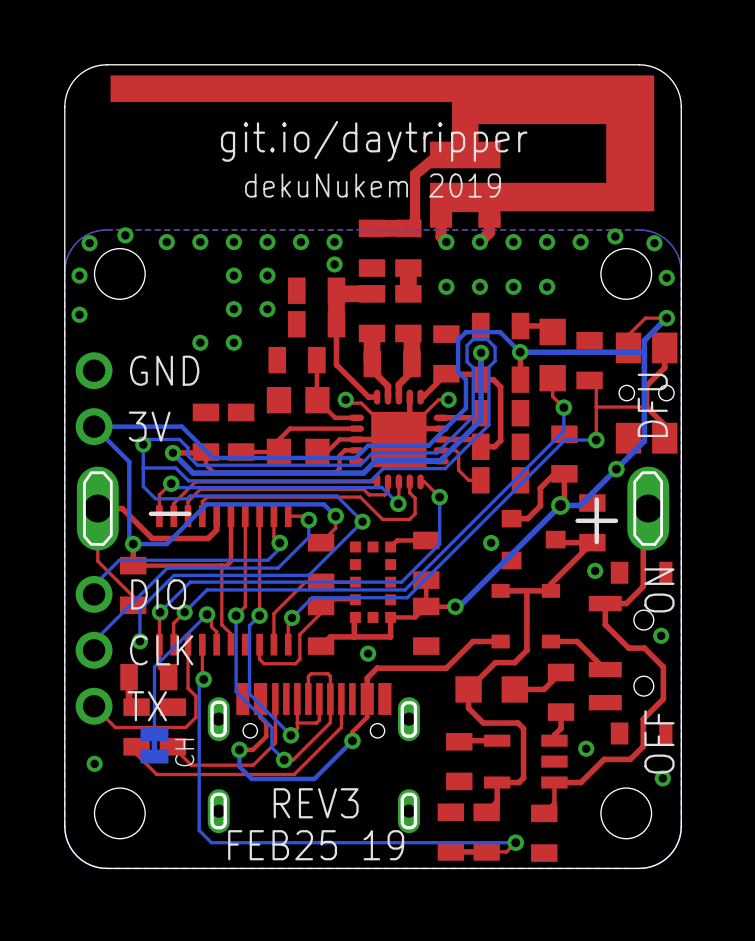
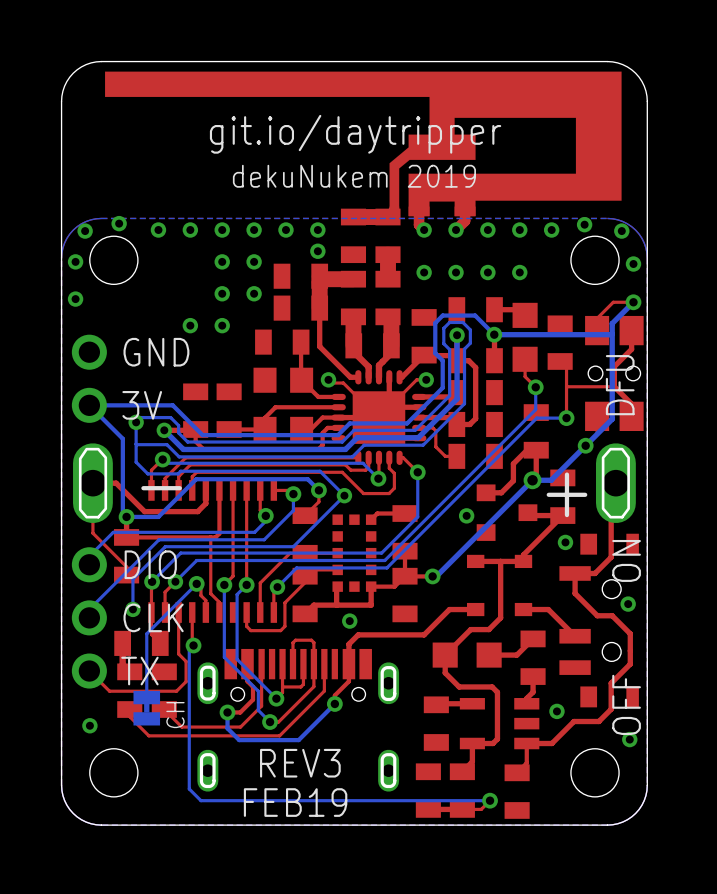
text: FEB25 19 (316, 845) -> FEB19 (295, 802)

